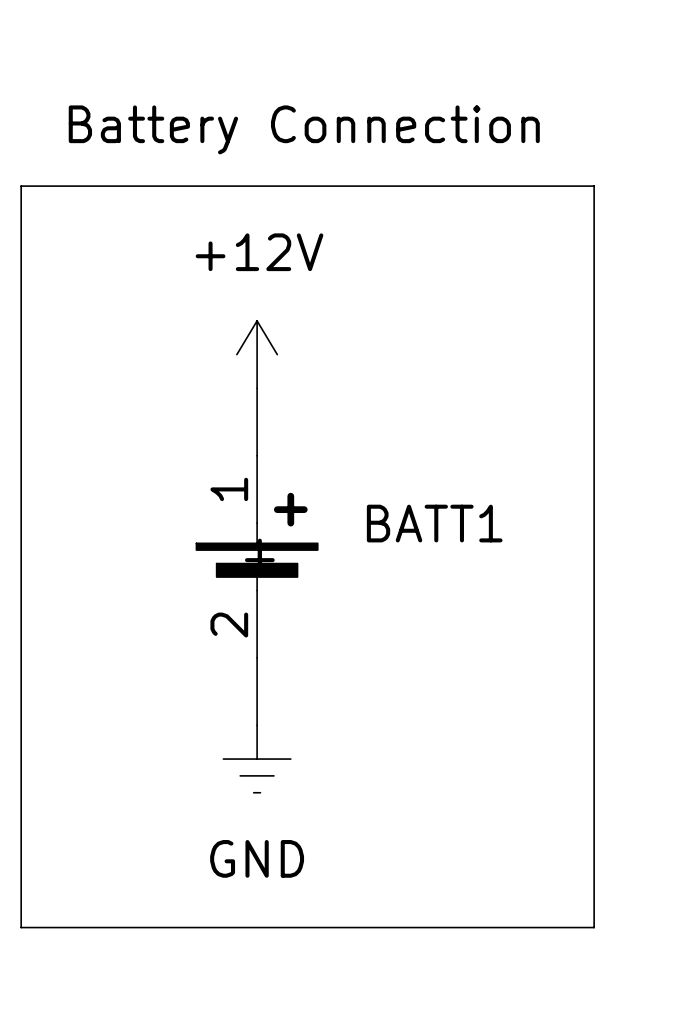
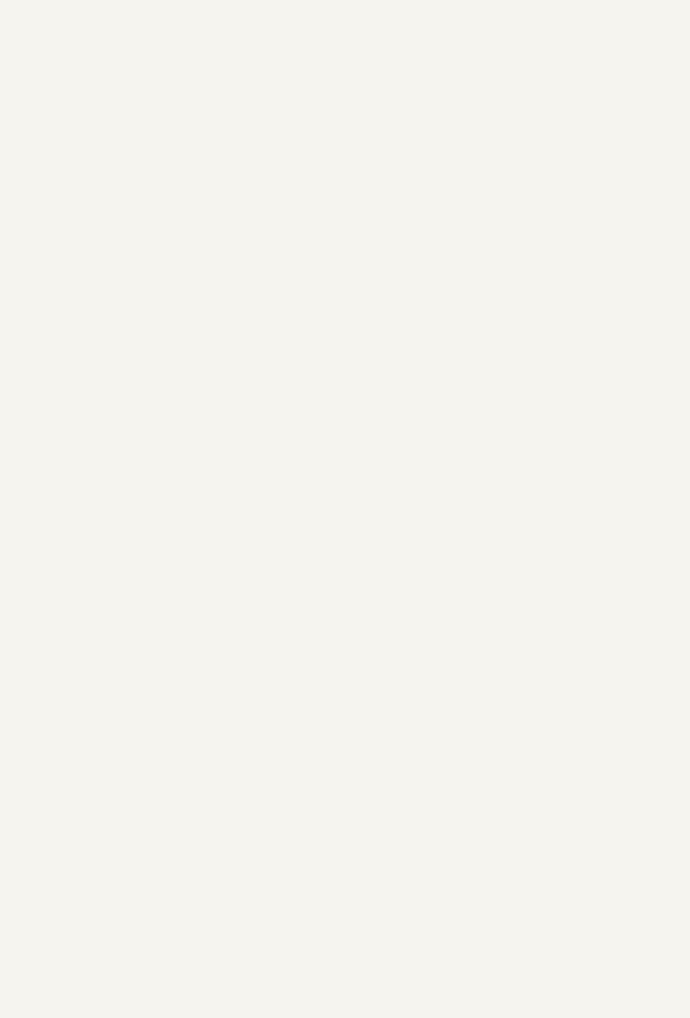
text: Battery Connection (304, 129) -> none
line: (21, 186) (594, 186) (594, 927) (21, 927) (21, 186) -> none
power symbol: +12V (257, 354) -> none
wire: (257, 388) (257, 455) -> none
BATT1: (257, 556) -> none
wire: (257, 657) (257, 725) -> none
power symbol: GND (257, 759) -> none

